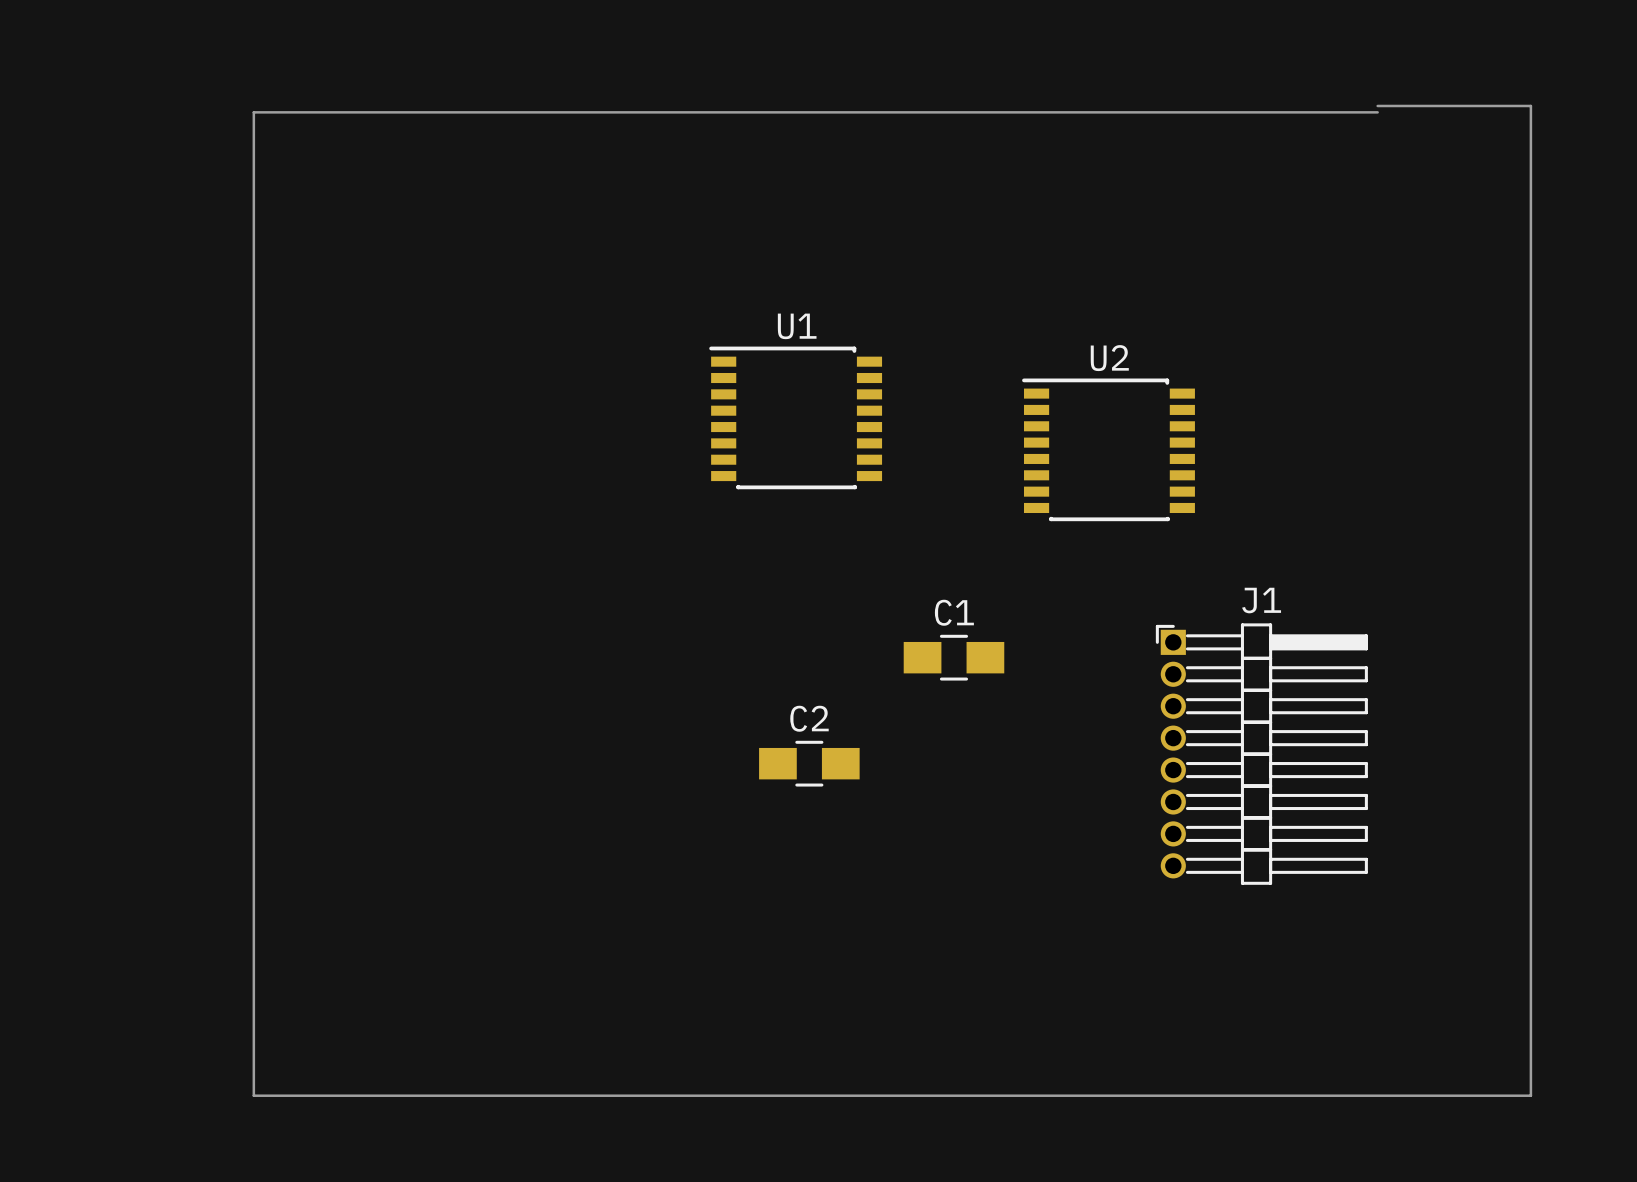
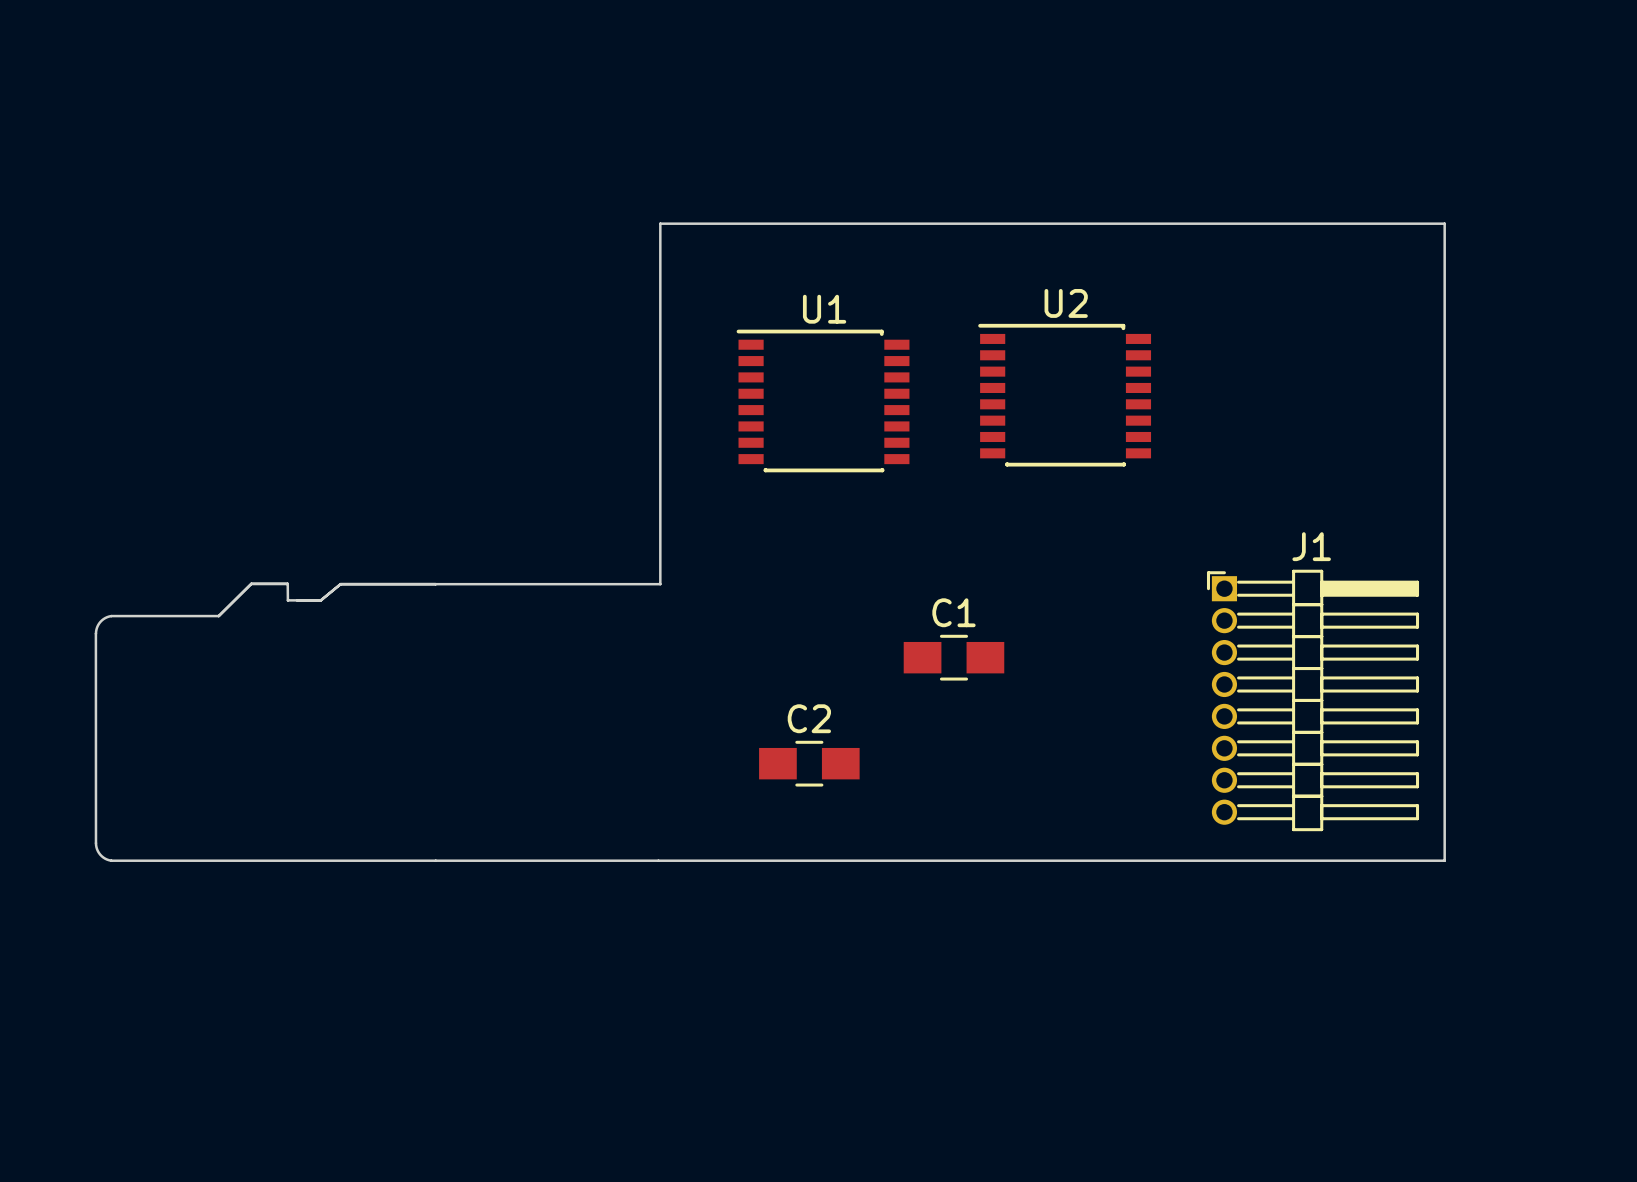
board edge: (1377, 105) (1530, 105) (1530, 1095) (253, 1095) (253, 112) (1377, 112) -> none
board edge: none -> (660, 223) (1444, 223) (1444, 860) (111, 860) (101, 856) (97, 849) (95, 843) (95, 633) (99, 623) (105, 618) (111, 616) (218, 616) (251, 583) (287, 583) (287, 600) (320, 600) (340, 584) (660, 584) (660, 223)
U1 position: (795, 417) -> (823, 400)
U2 position: (1108, 449) -> (1064, 395)
J1 position: (1261, 754) -> (1313, 700)

